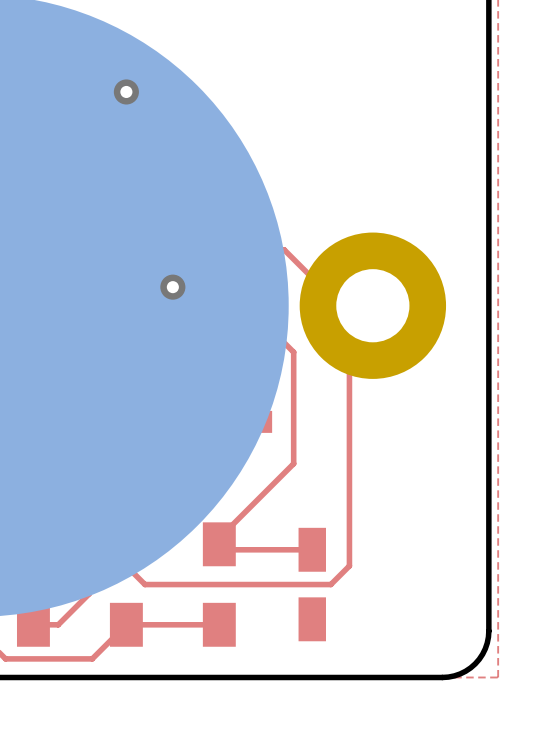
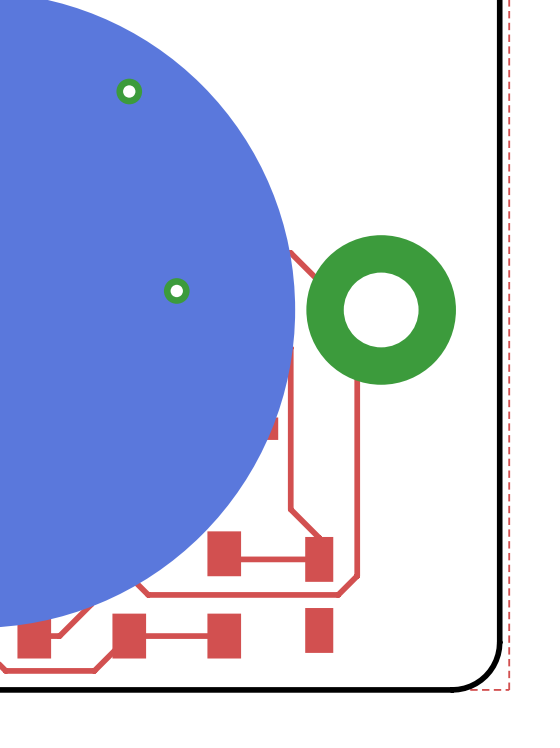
top track: (284, 342) (293, 352) (293, 463) (219, 538) (219, 544) -> (290, 347) (290, 509) (319, 537) (319, 559)

